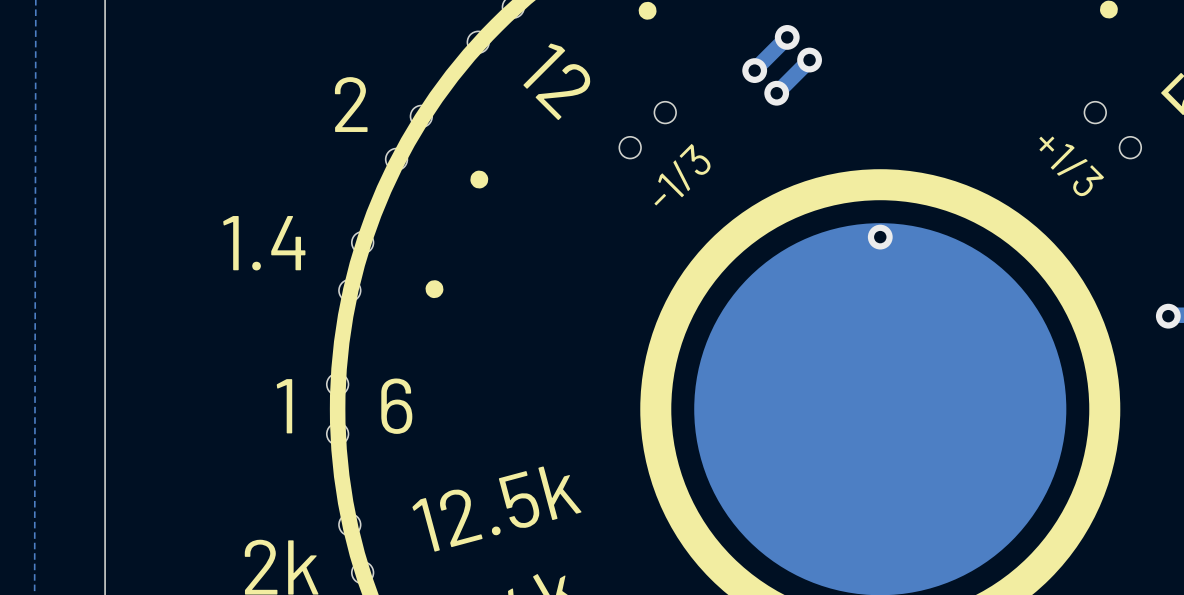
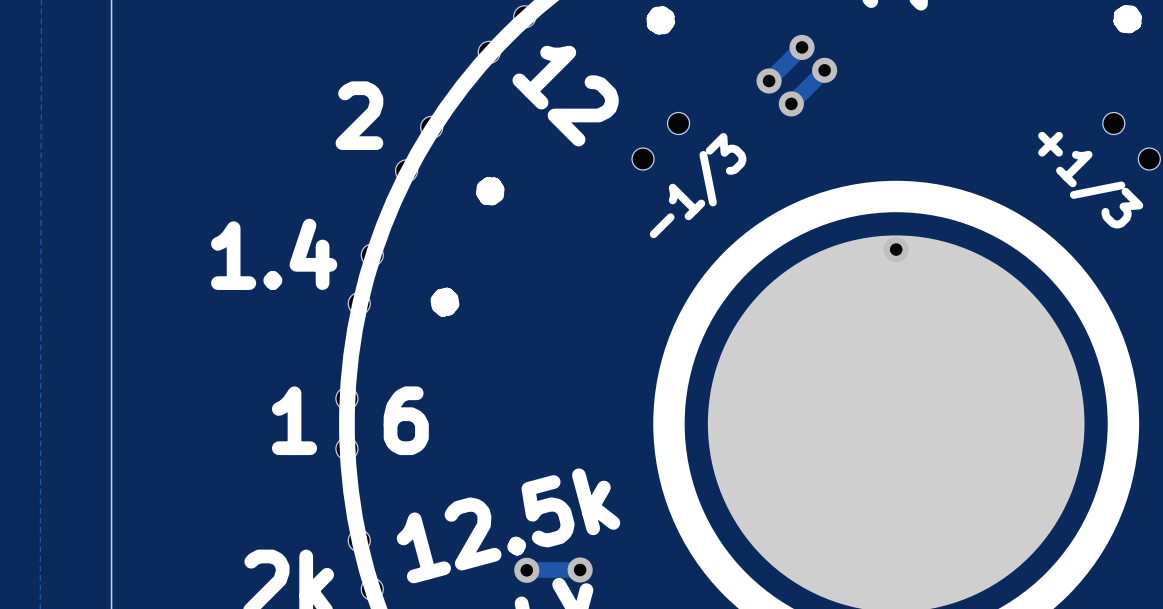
track: none -> (580, 569) (527, 569)
via: none -> (580, 569)
via: none -> (526, 570)

